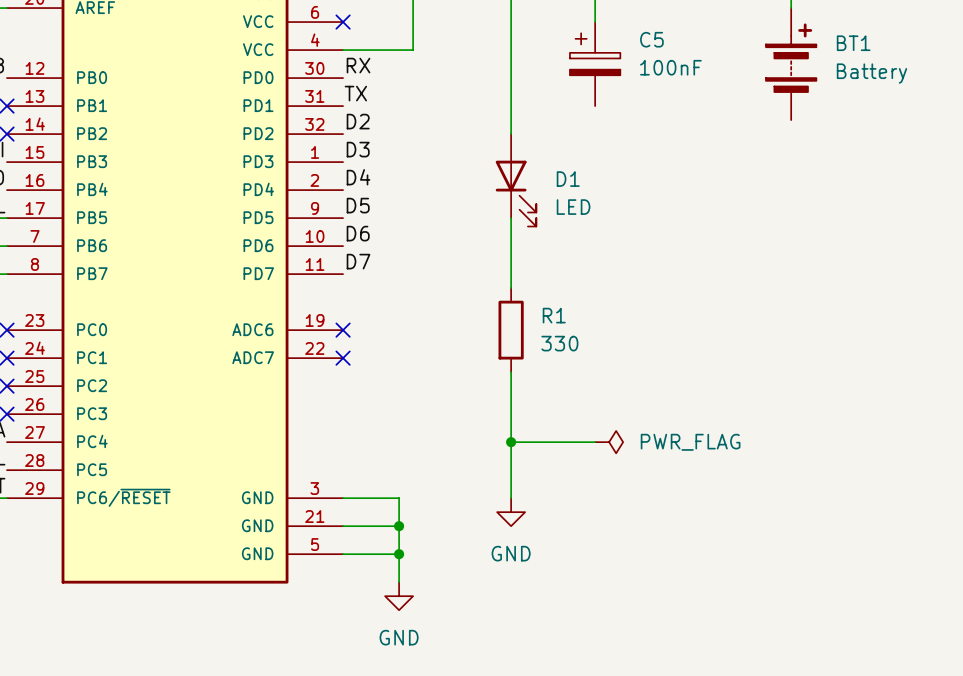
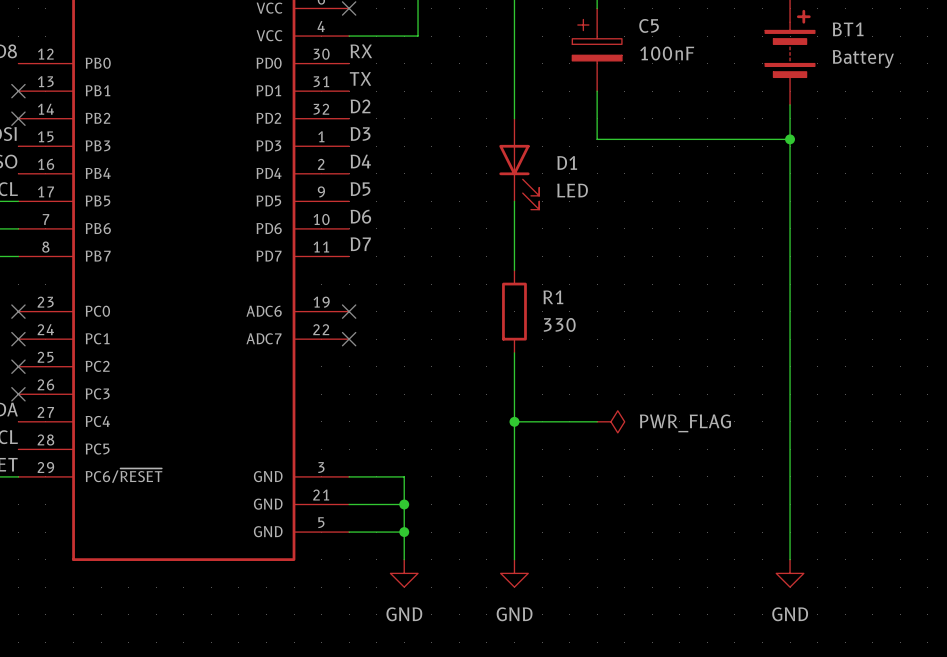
wire: none -> (597, 91) (597, 139) (790, 139)
wire: none -> (790, 104) (790, 559)
junction: none -> (790, 139)
wire: none -> (514, 476) (514, 559)
power symbol position: GND (511, 512) -> GND (514, 573)
power symbol: none -> GND (790, 573)

